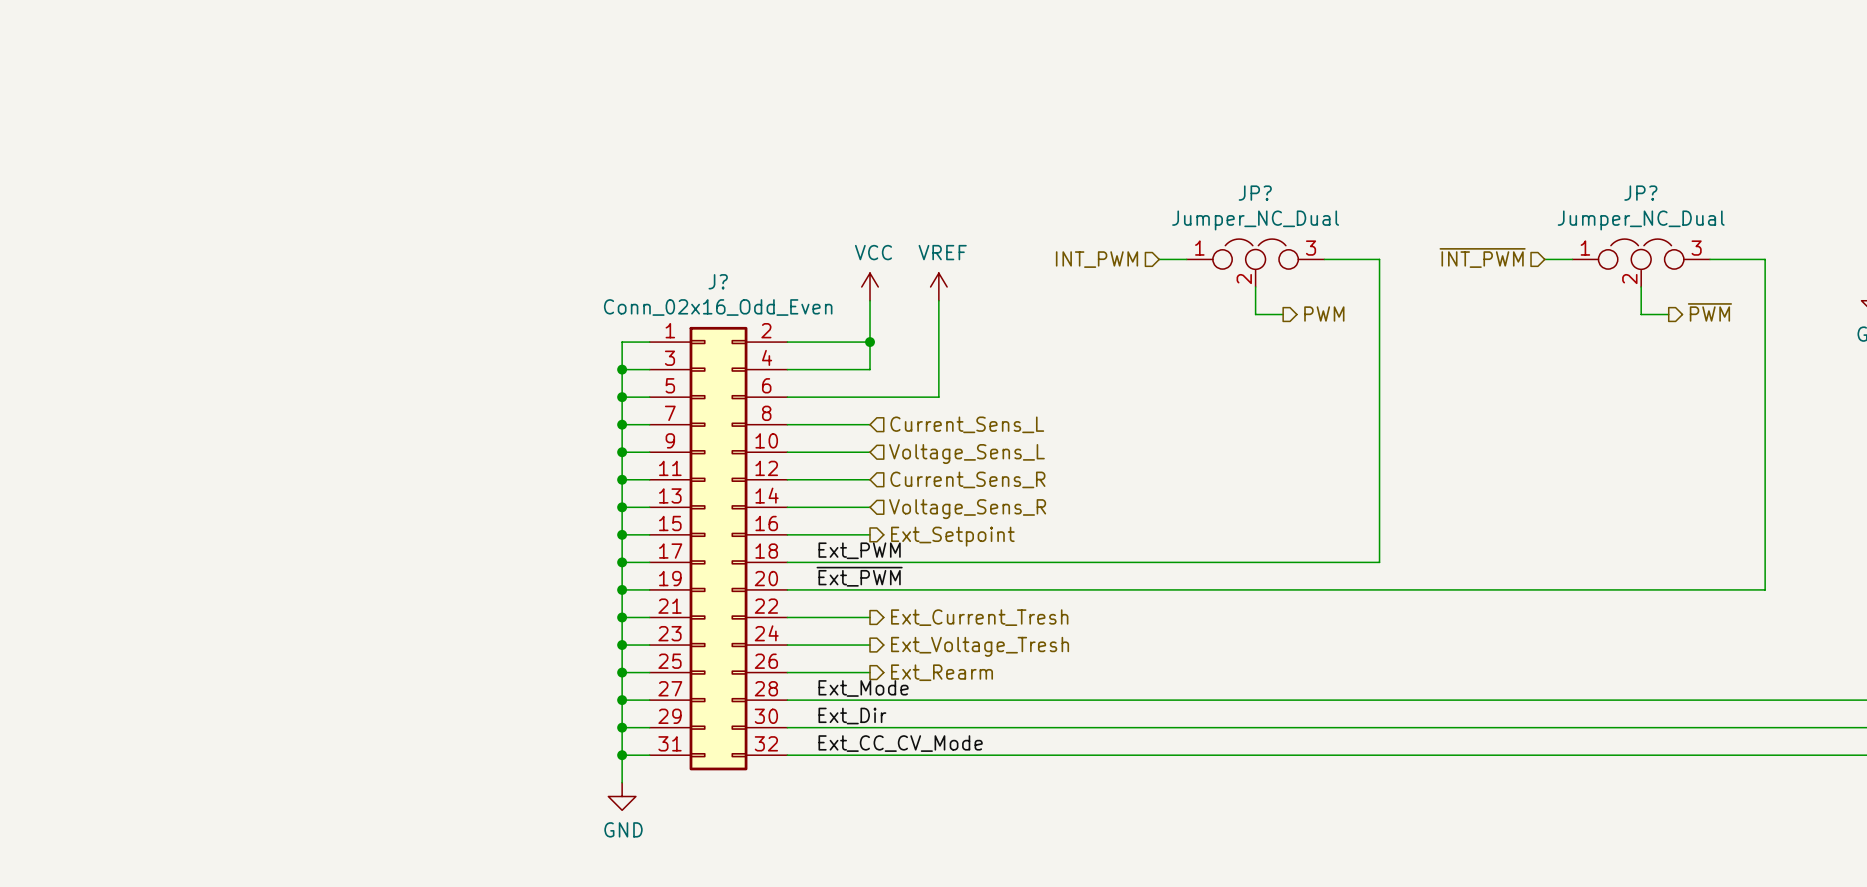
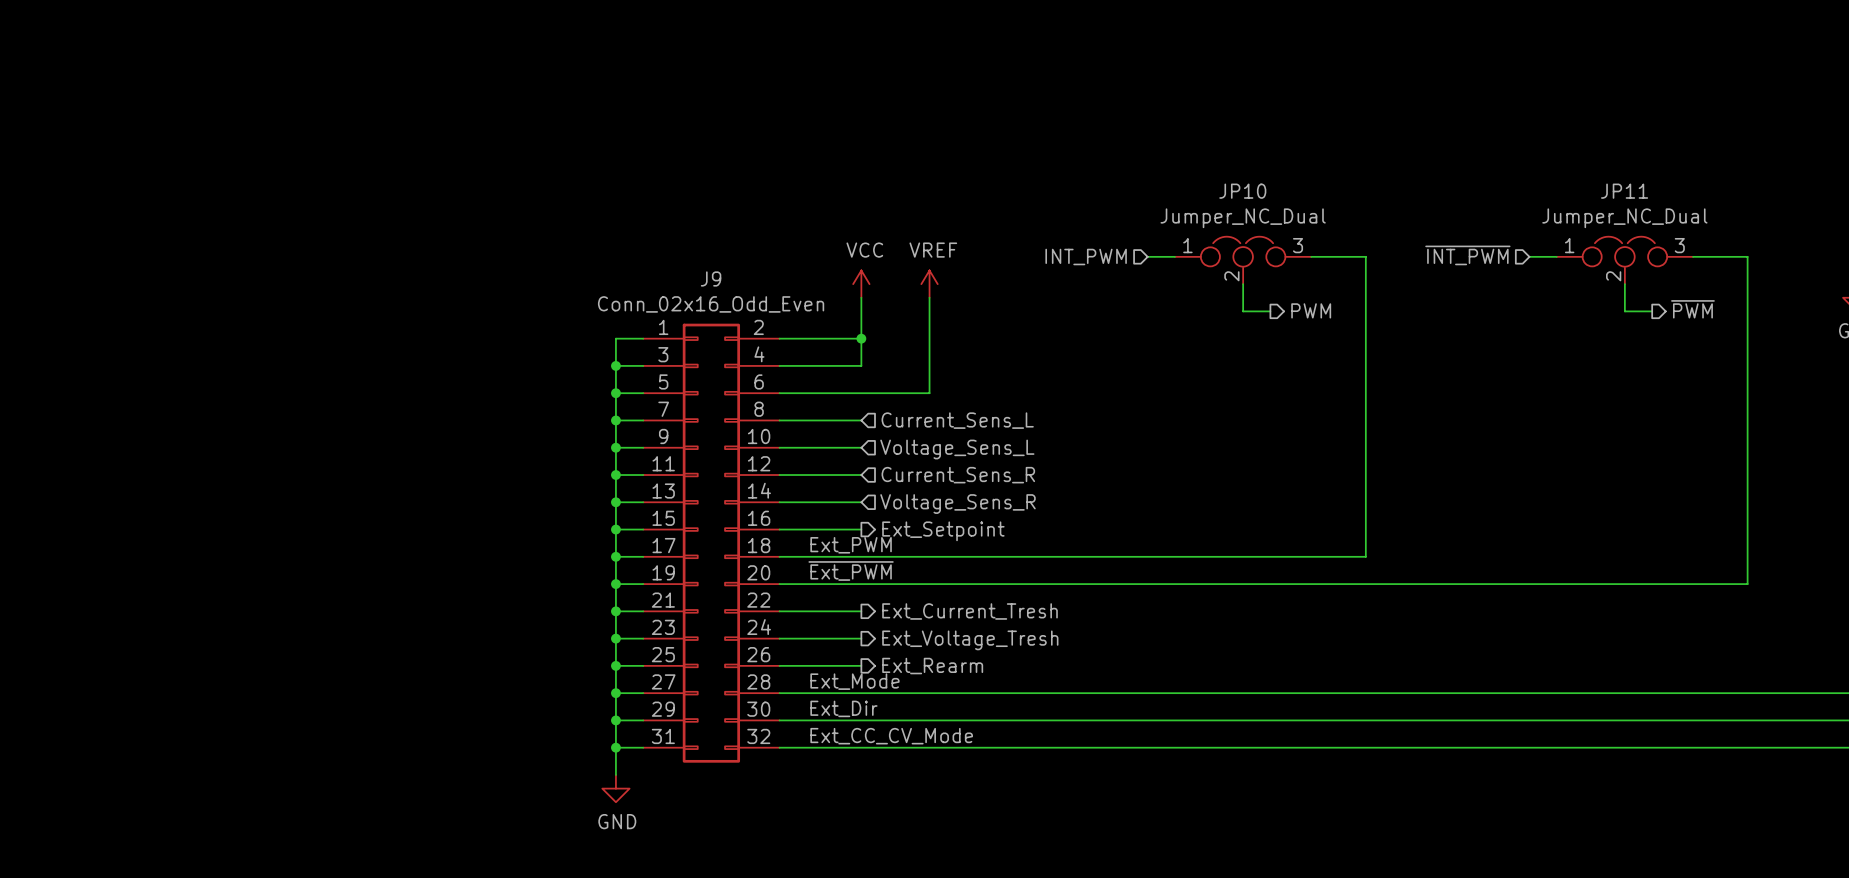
JP? name: JP? (1255, 193) -> JP10 (1242, 191)
JP? name: JP? (1640, 193) -> JP11 (1624, 191)
J? name: J? (718, 281) -> J9 (711, 278)

